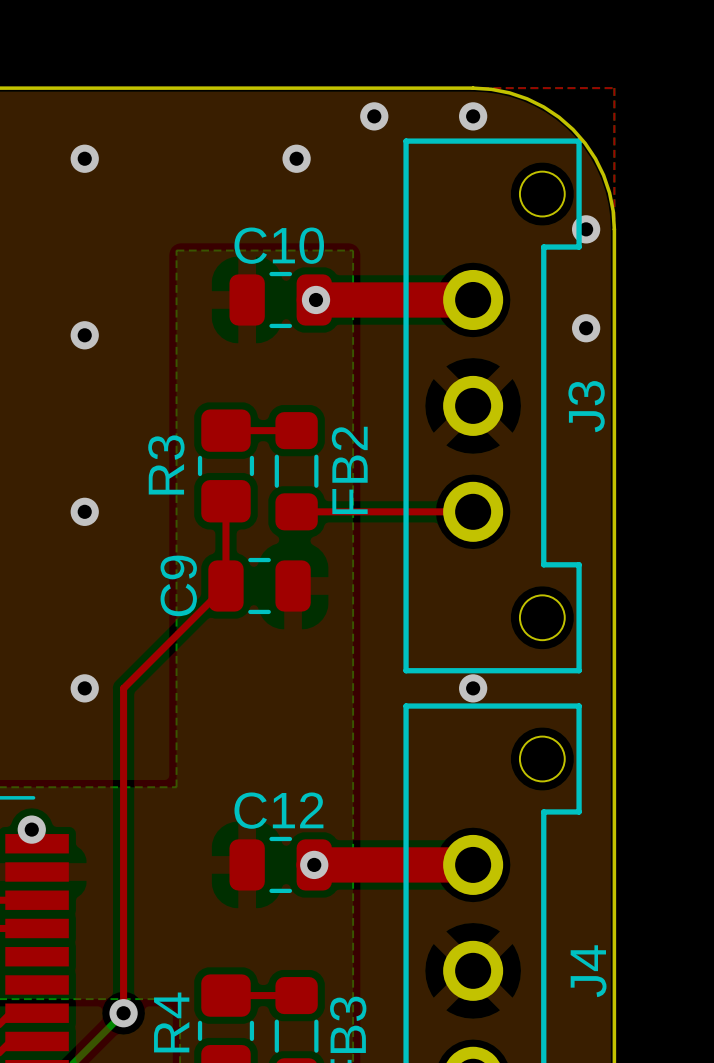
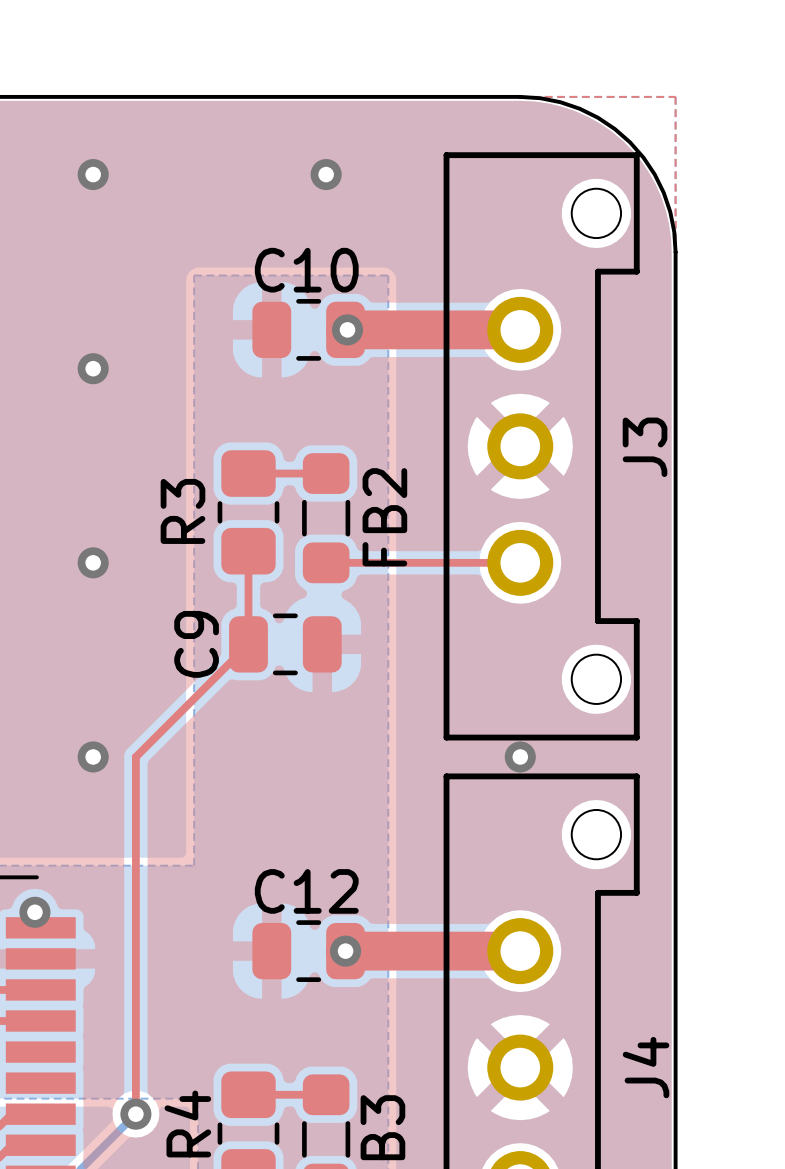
via: (374, 116) -> none
via: (473, 116) -> none
via: (586, 229) -> none
via: (586, 328) -> none

